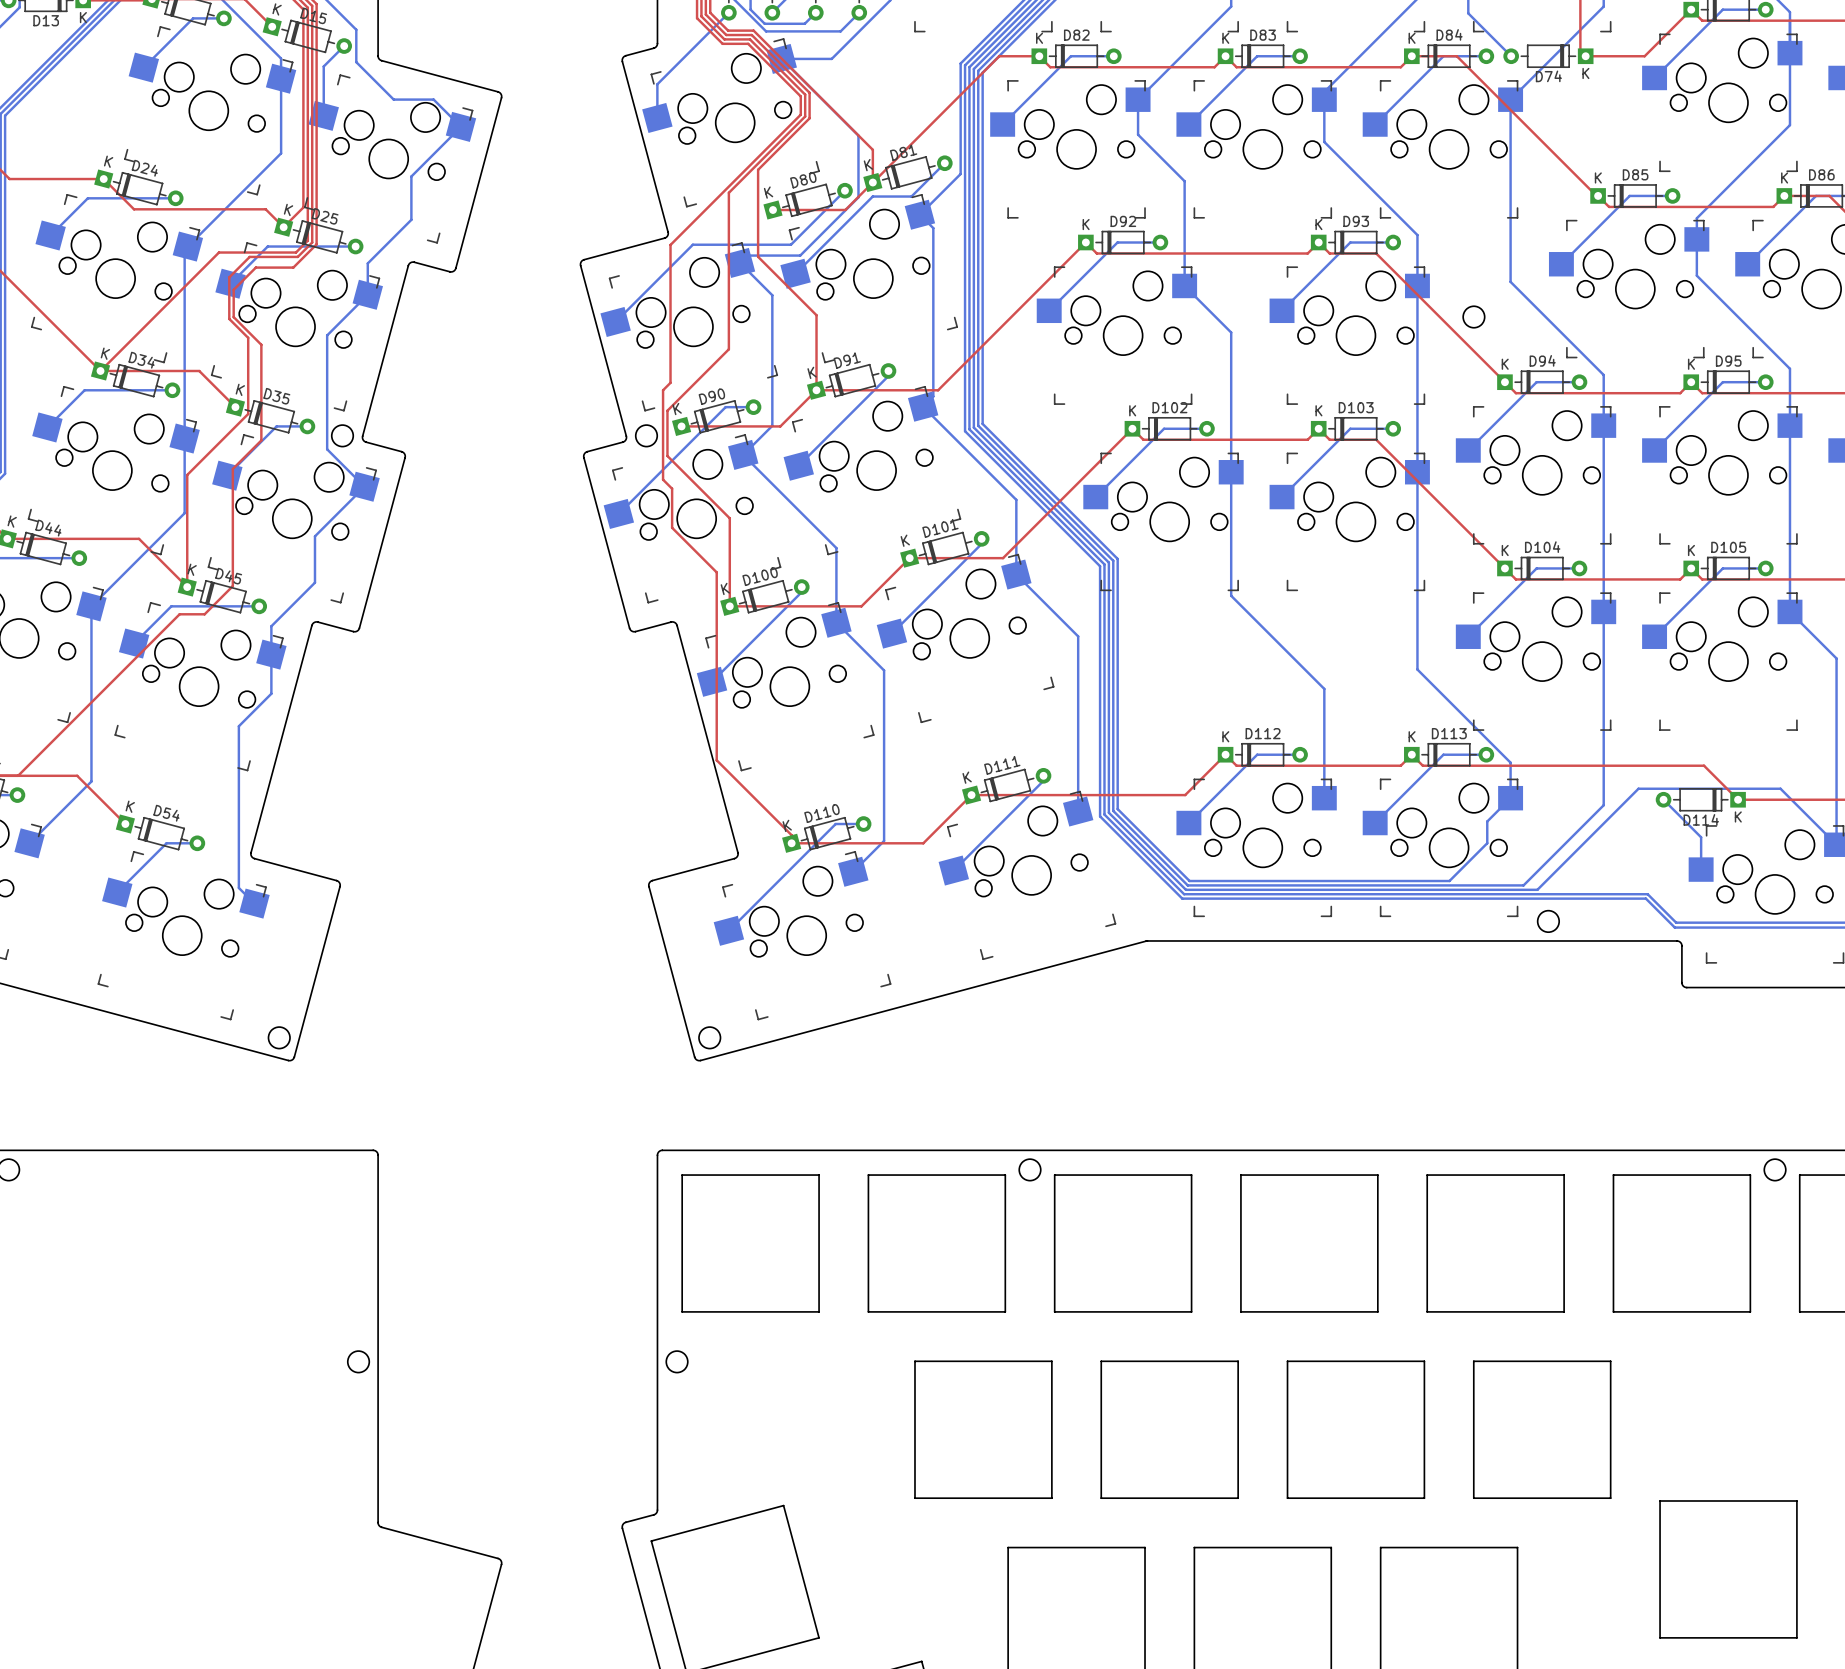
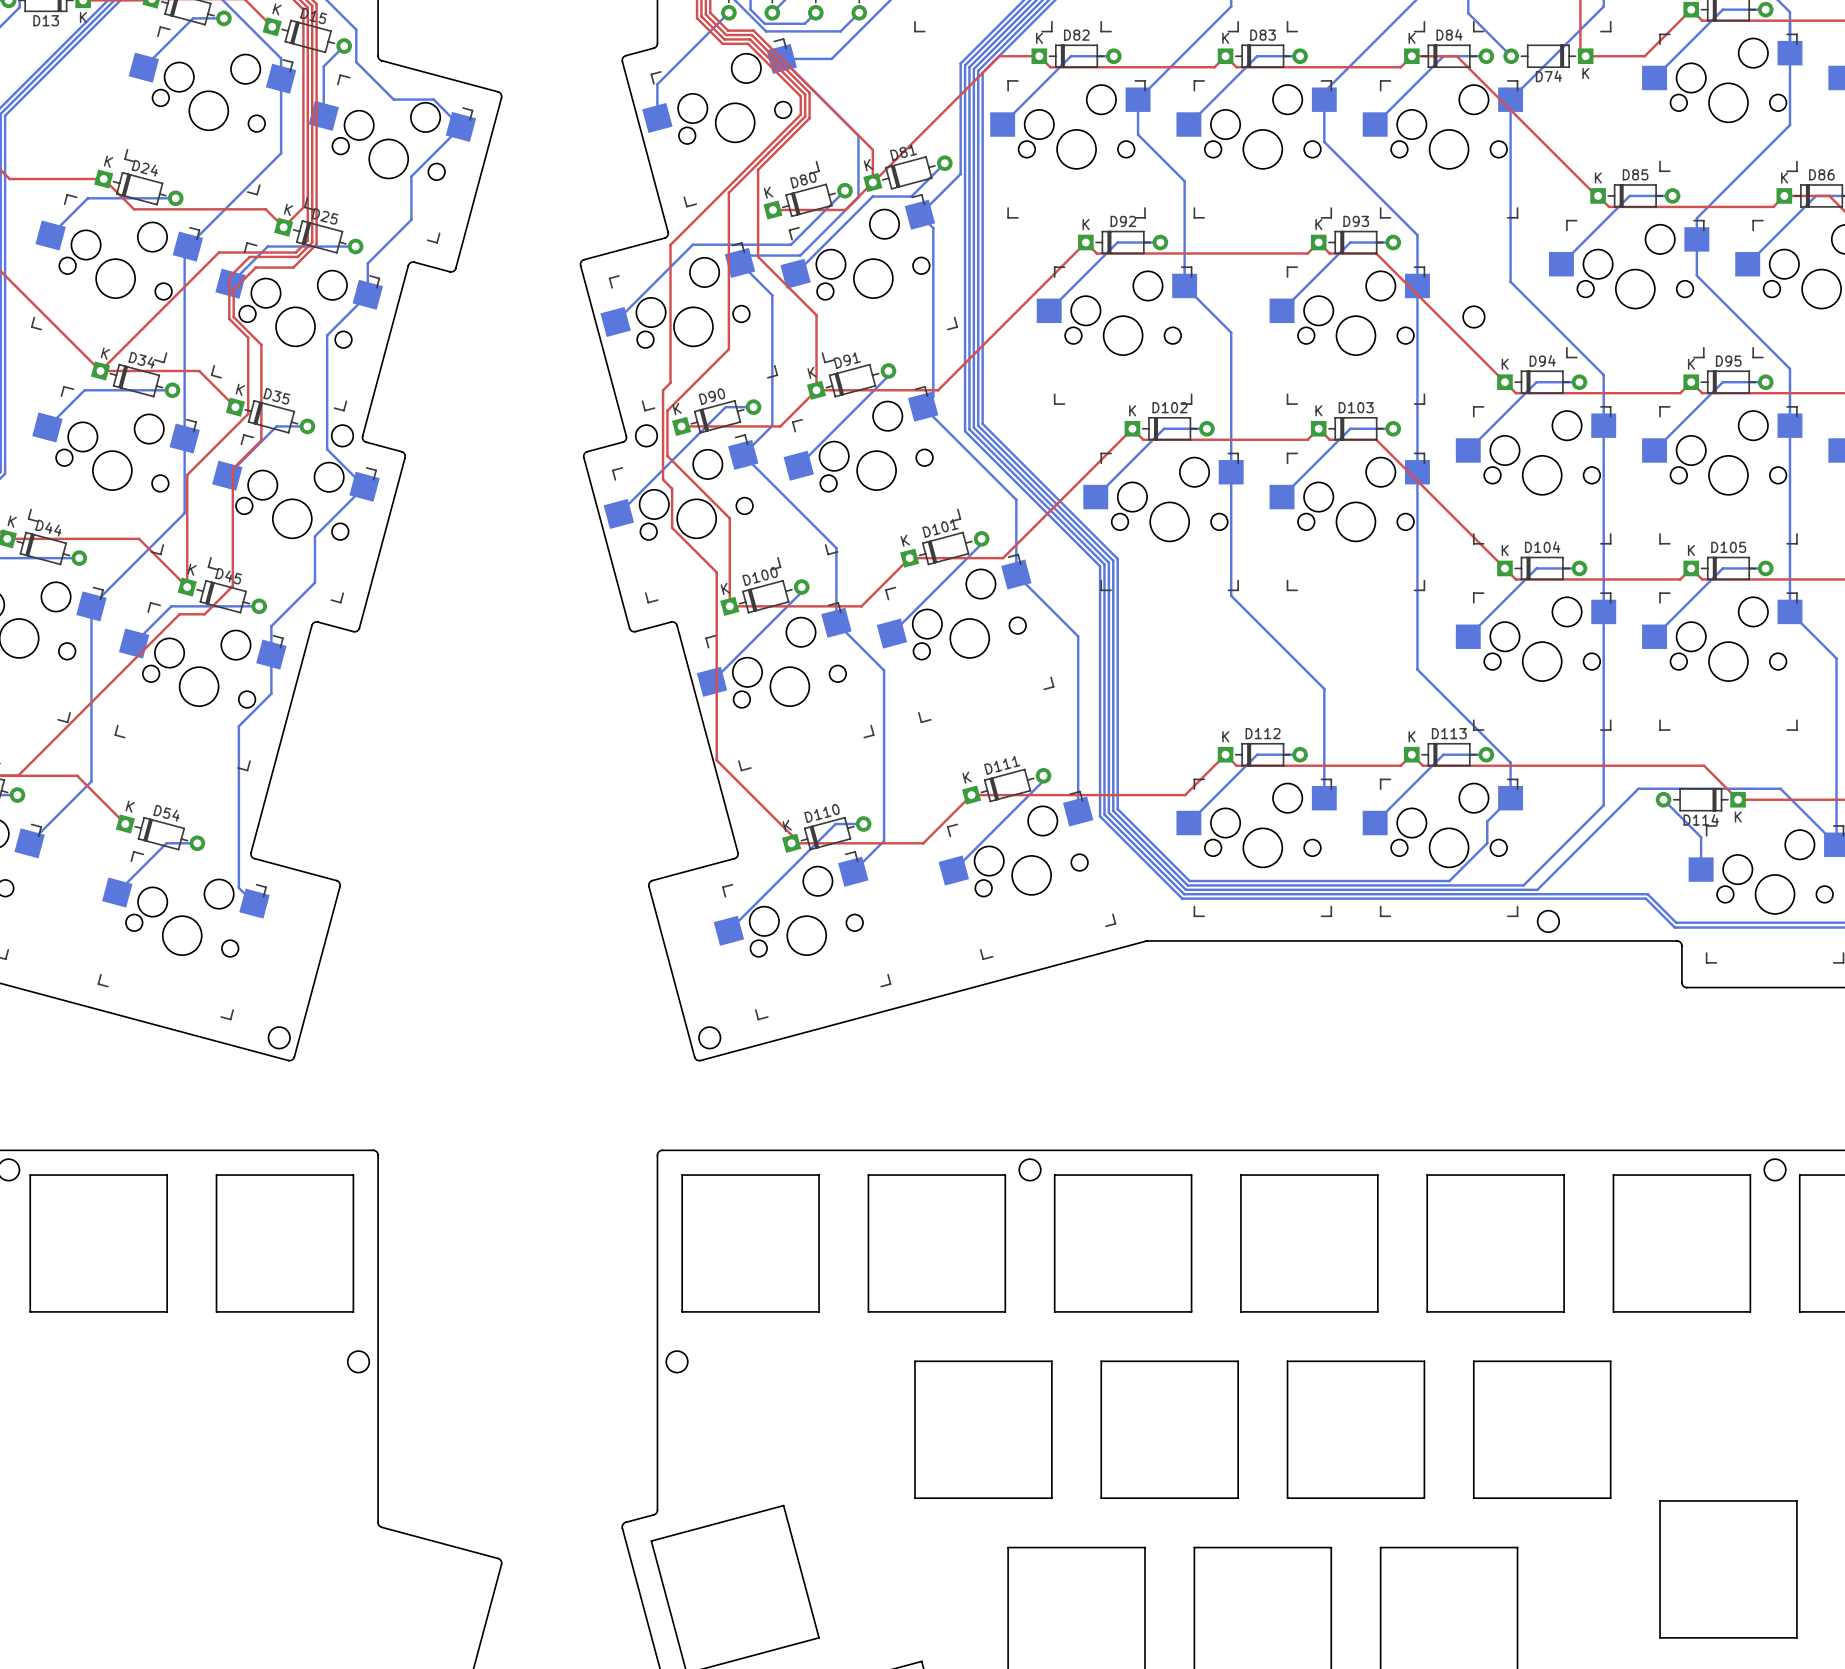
board edge: none -> (30, 1175) (167, 1175) (167, 1311) (30, 1311) (30, 1175)
board edge: none -> (216, 1175) (353, 1175) (353, 1311) (216, 1311) (216, 1175)

